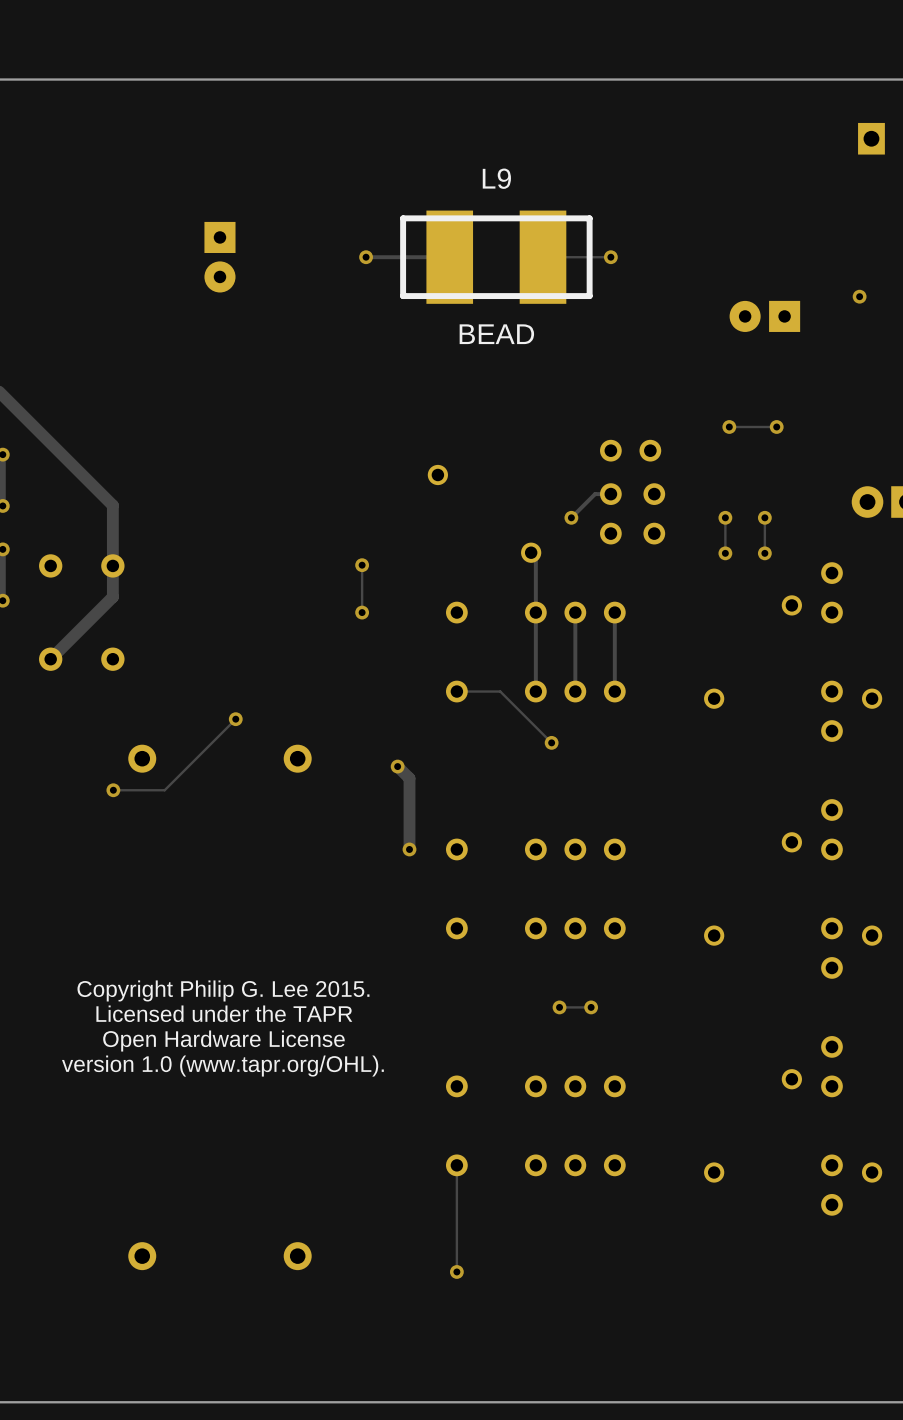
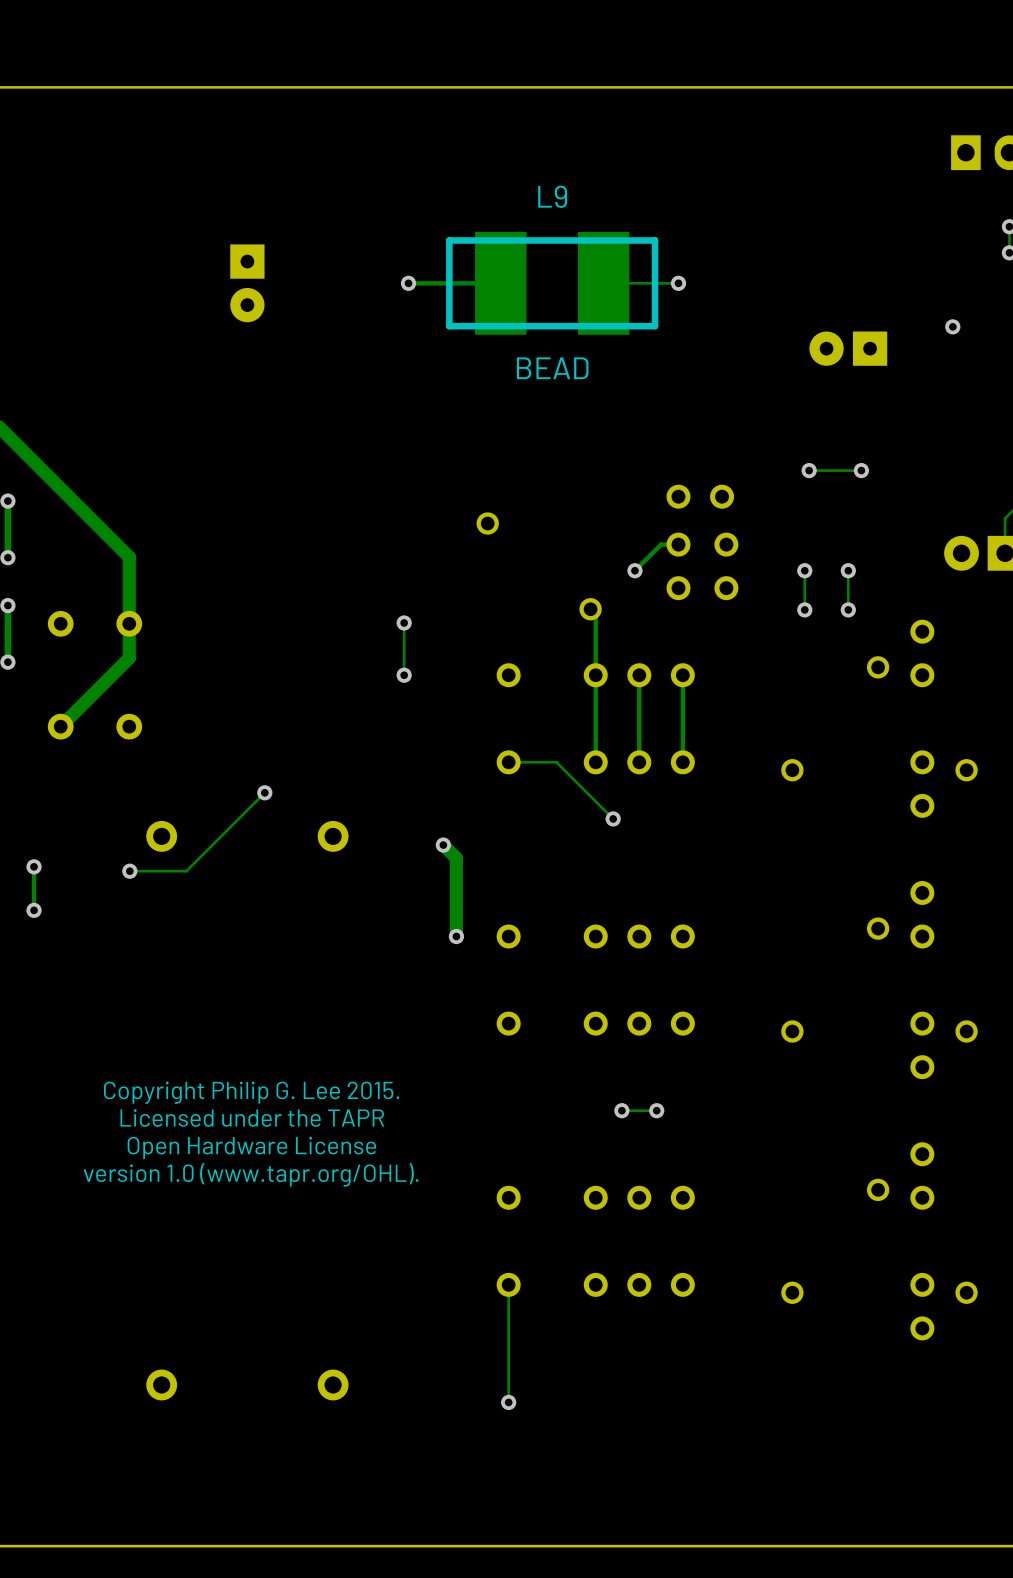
track: none -> (34, 866) (34, 910)
via: none -> (34, 866)
via: none -> (34, 910)

